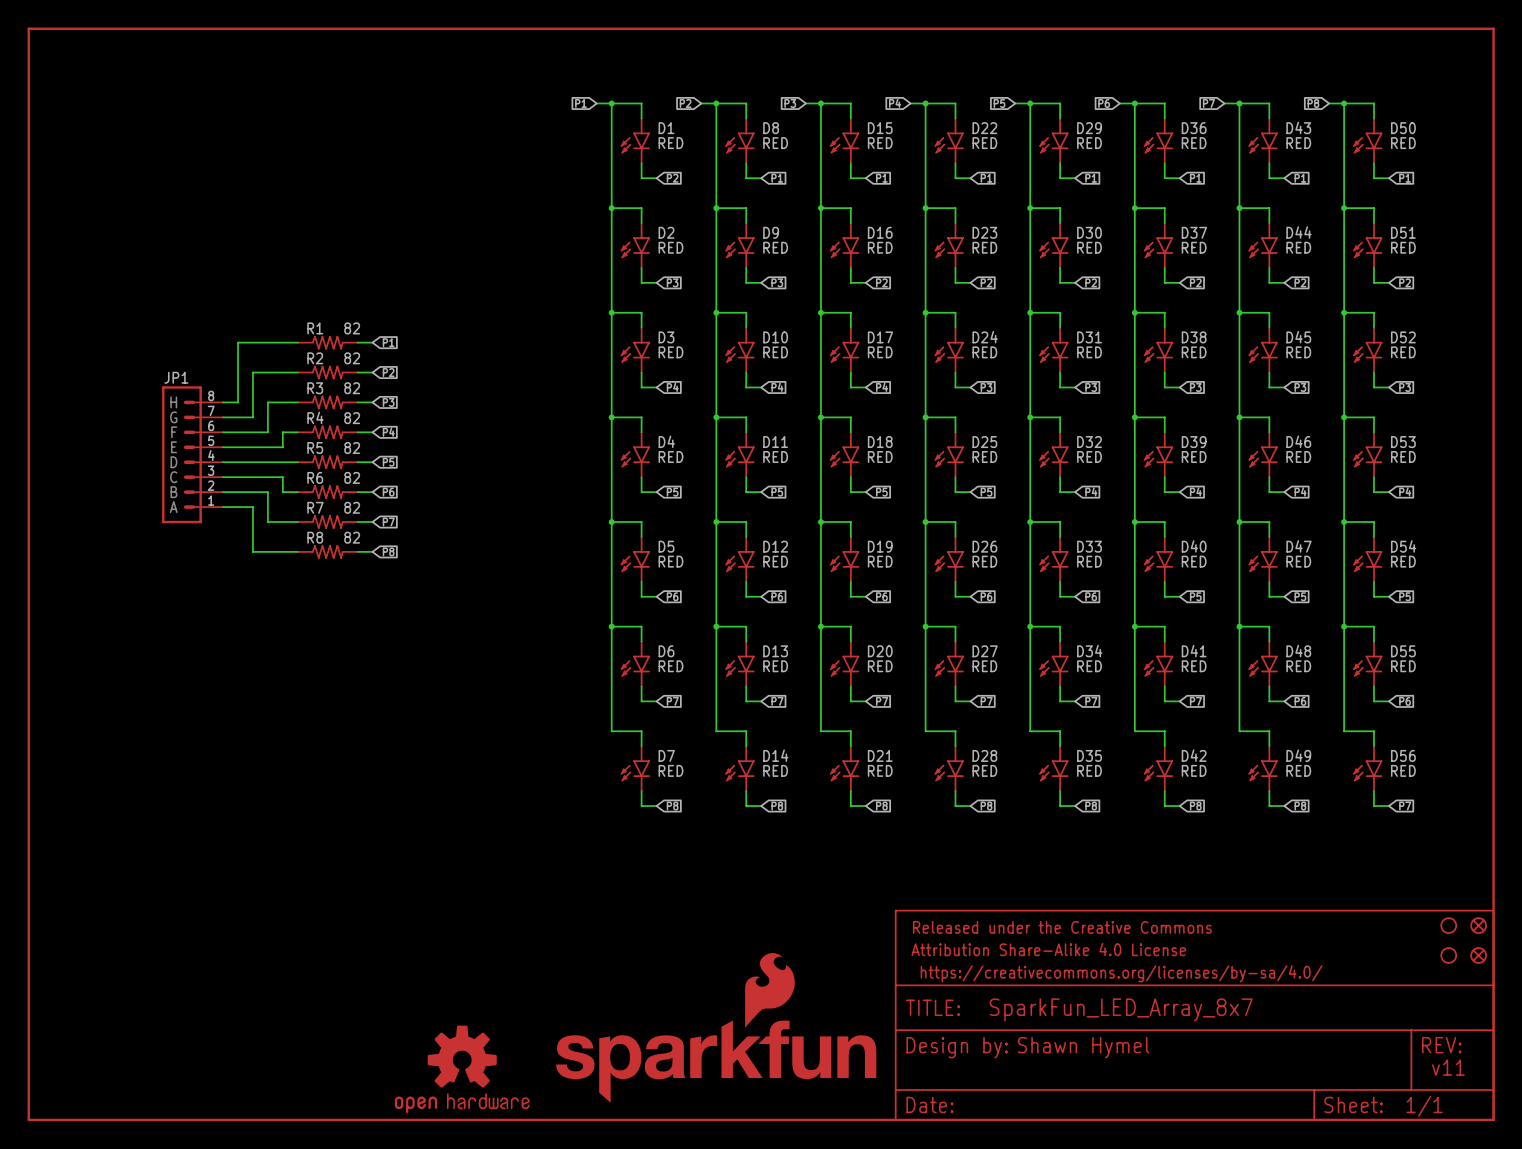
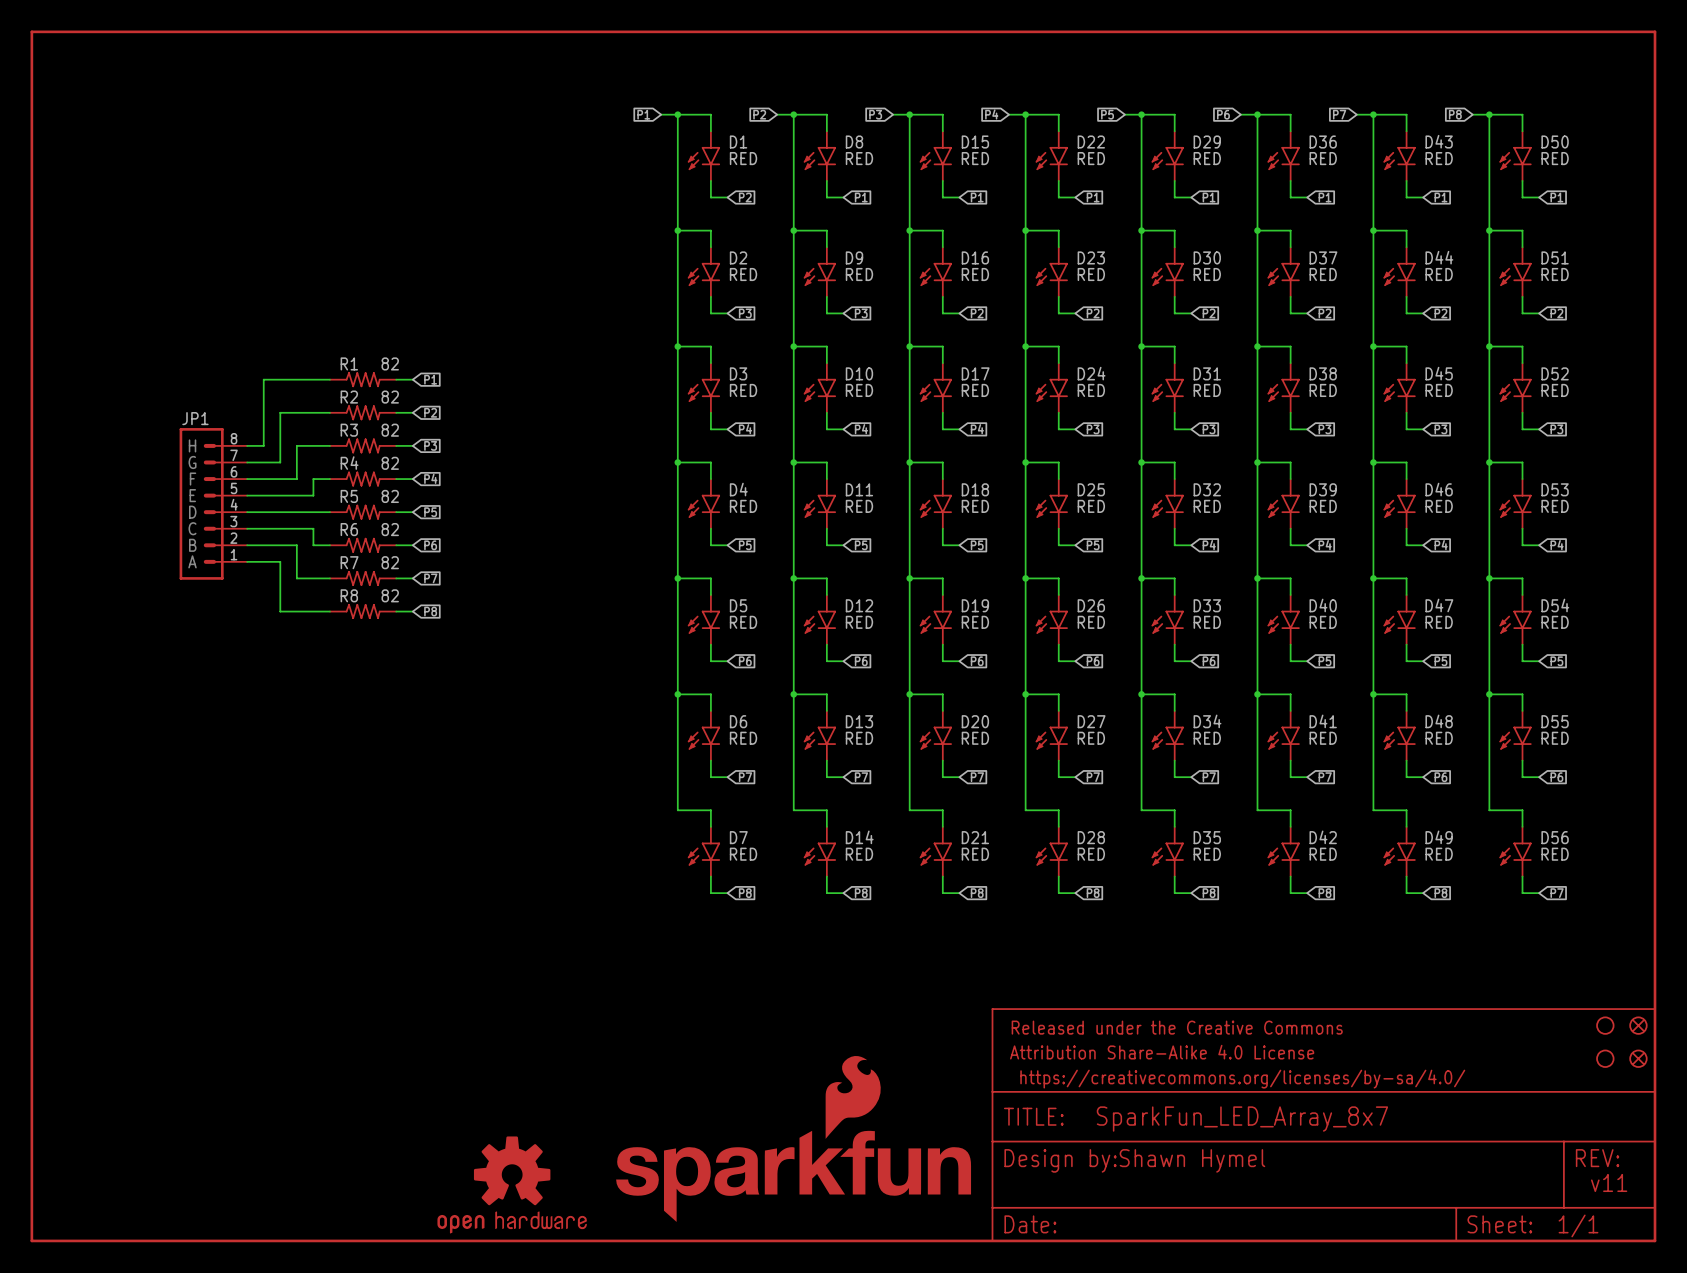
part text: none -> Shawn Hymel (1192, 1160)
text: Shawn Hymel (1083, 1047) -> none
text: v11 (1448, 1067) -> none
part text: none -> v11 (1609, 1182)

